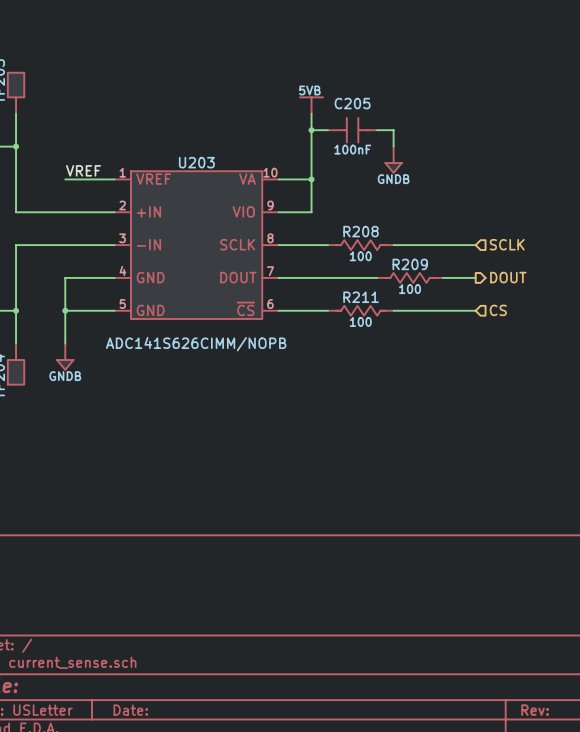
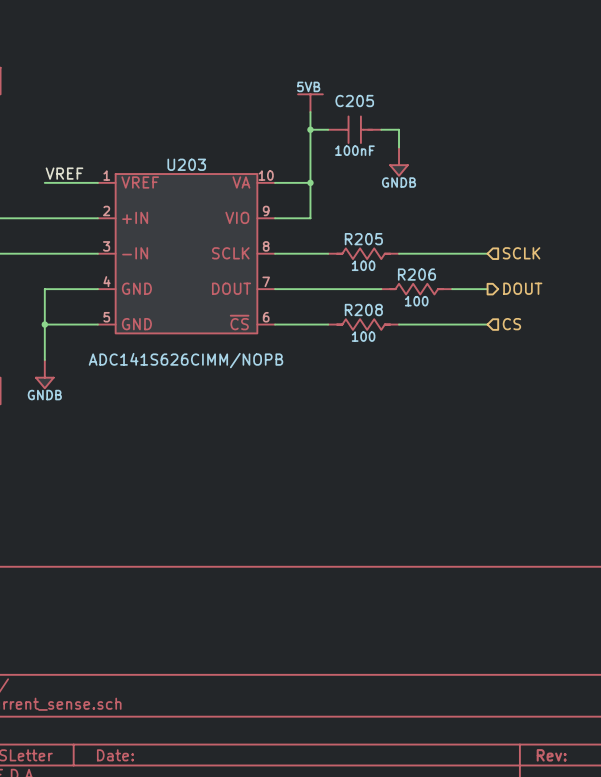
R208 name: R208 (361, 231) -> R205 (363, 239)
R209 name: R209 (410, 264) -> R206 (416, 274)
R211 name: R211 (361, 297) -> R208 (363, 309)

